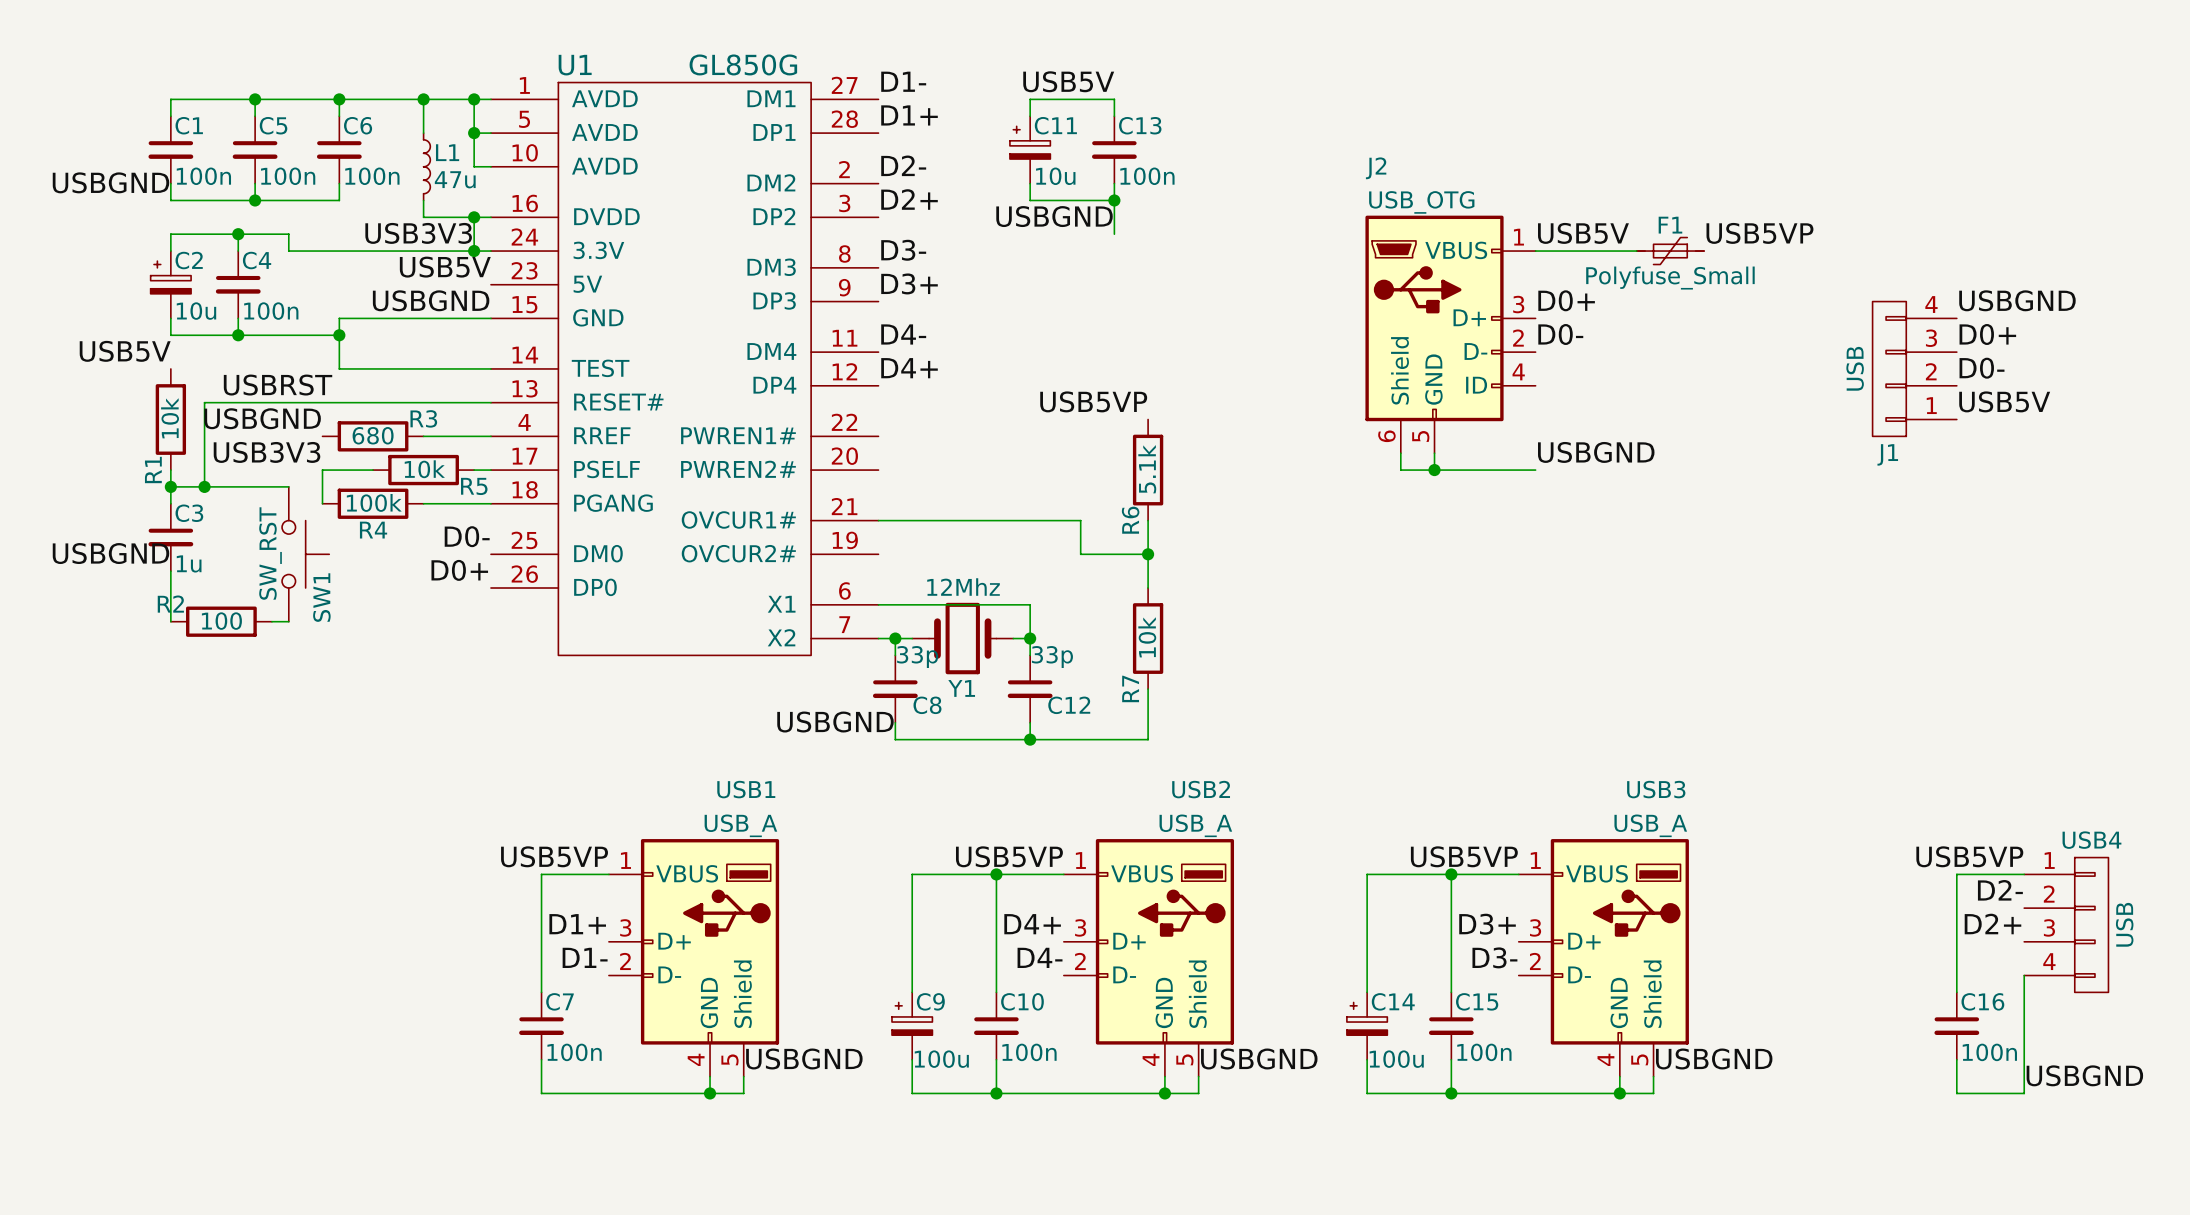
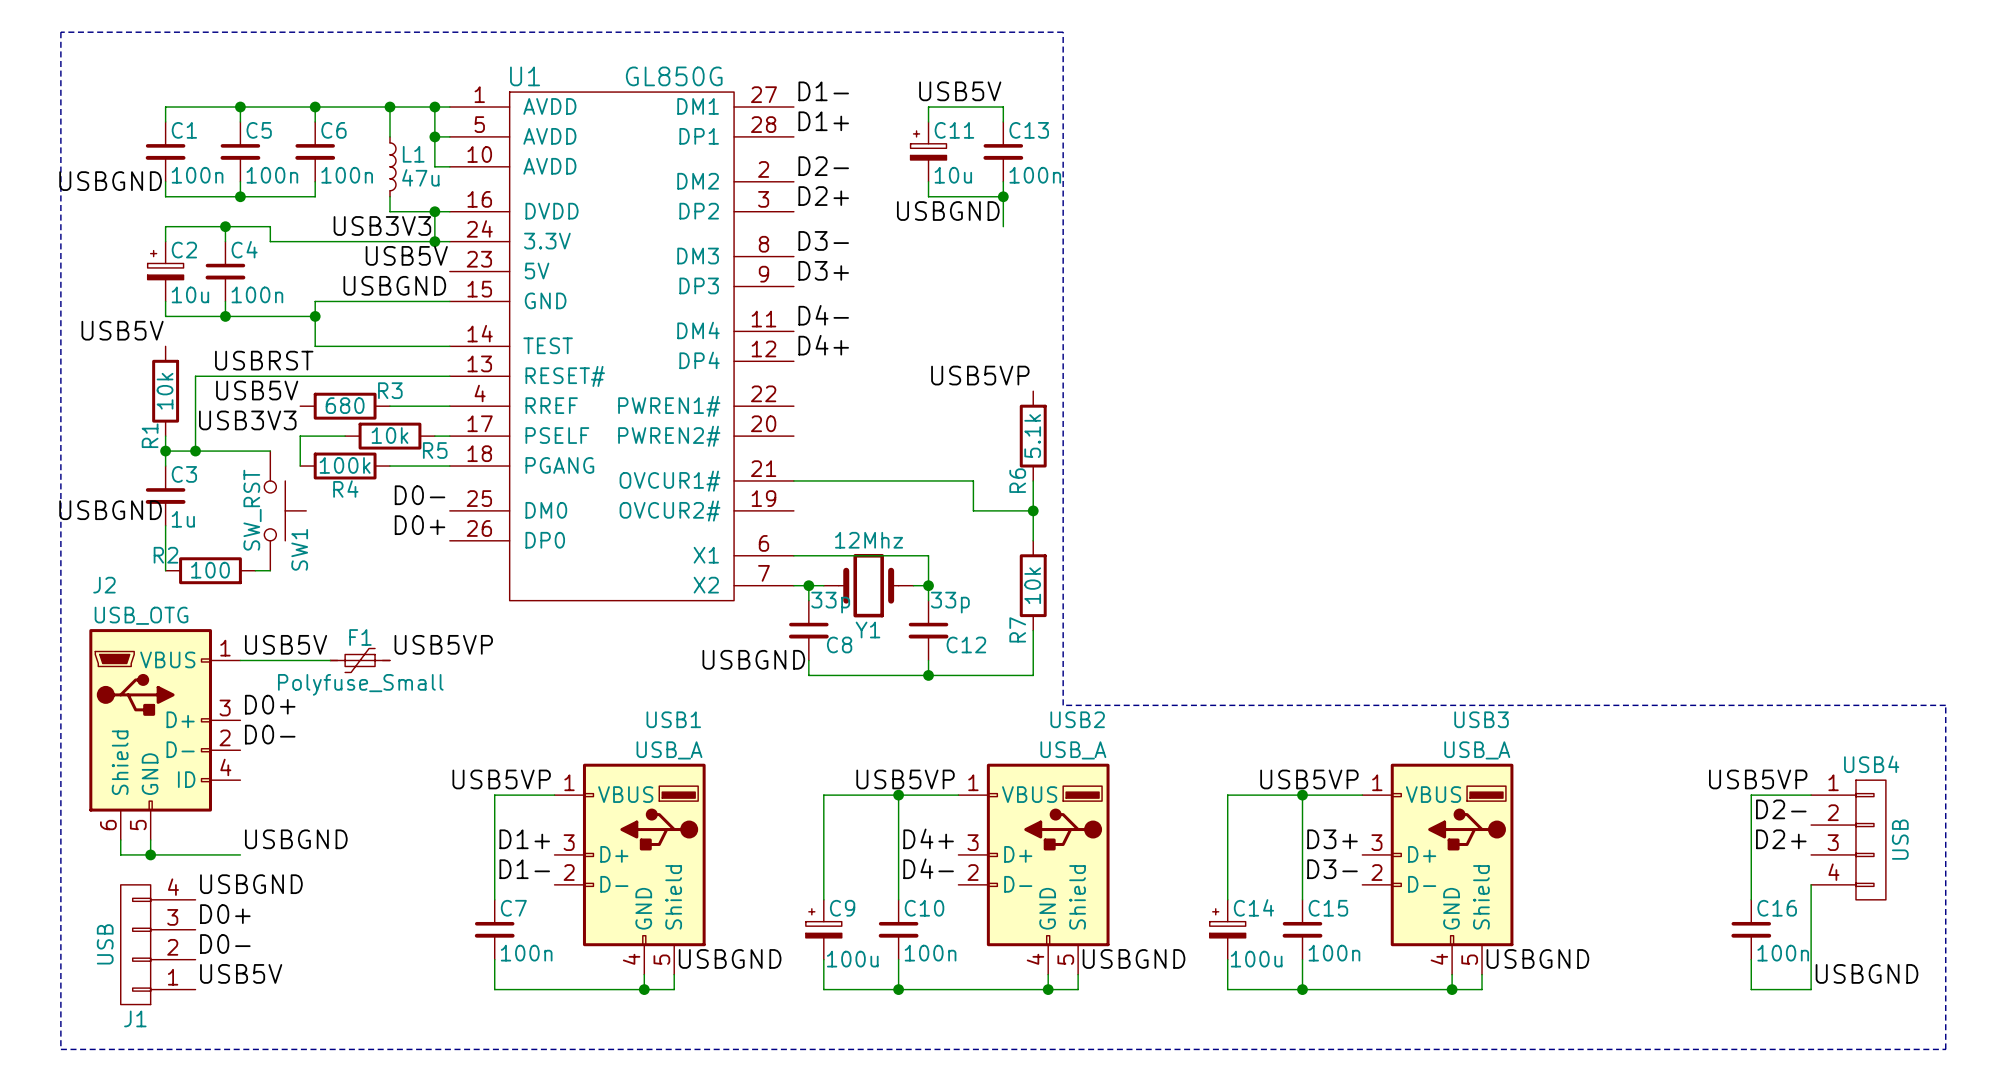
line: none -> (60, 32) (60, 1049) (1945, 1049) (1945, 705) (1063, 705) (1063, 32) (60, 32)
label: USB5V (1583, 233) -> none
label: USB5VP (1759, 233) -> none
wire: (1535, 251) (1636, 251) -> none
F1 position: (1670, 251) -> (360, 660)
label: D0+ (1566, 300) -> none
label: USBGND (2017, 300) -> none
J2 position: (1450, 334) -> (164, 734)
label: D0- (1560, 334) -> none
label: D0+ (1987, 334) -> none
J1 position: (1914, 368) -> (158, 944)
label: D0- (1982, 368) -> none
label: USB5V (2004, 401) -> none
label: USBGND (262, 418) -> USB5V (257, 390)
label: USBGND (1596, 452) -> none
wire: (1400, 453) (1400, 470) (1535, 470) -> none
wire: (1434, 453) (1434, 470) -> none
junction: (1434, 470) -> none
label: none -> USB5V (286, 644)
label: none -> USB5VP (443, 644)
wire: none -> (240, 660) (330, 660)
label: none -> D0+ (270, 704)
label: none -> D0- (270, 734)
wire: none -> (120, 839) (120, 854) (240, 854)
wire: none -> (150, 839) (150, 854)
label: none -> USBGND (296, 839)
junction: none -> (150, 854)
label: none -> USBGND (251, 884)
label: none -> D0+ (225, 914)
label: none -> D0- (225, 944)
label: none -> USB5V (241, 973)

